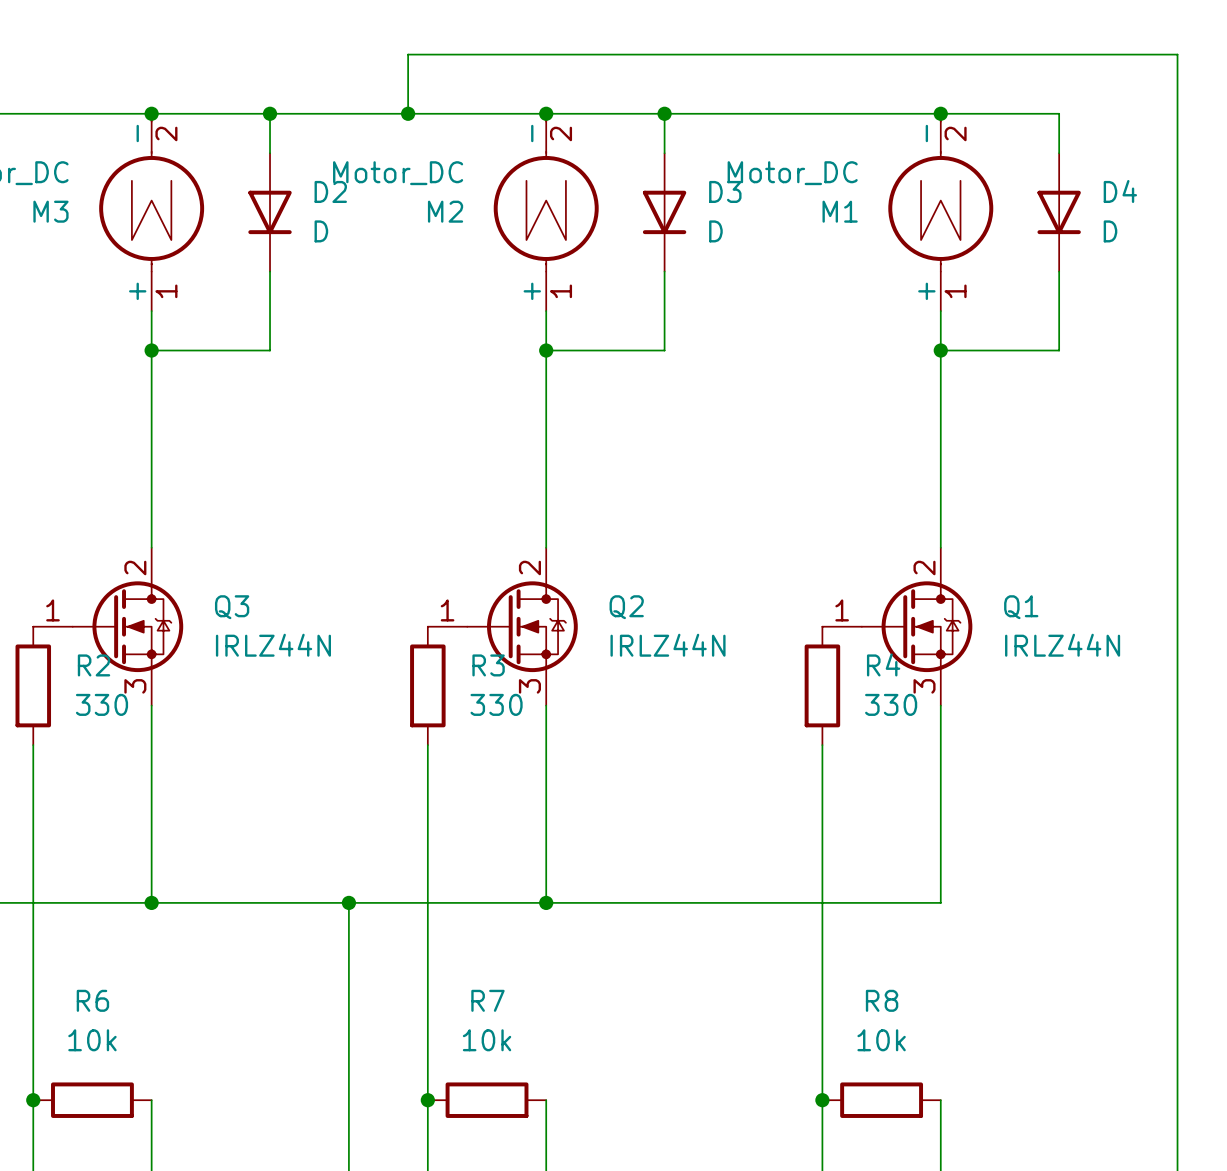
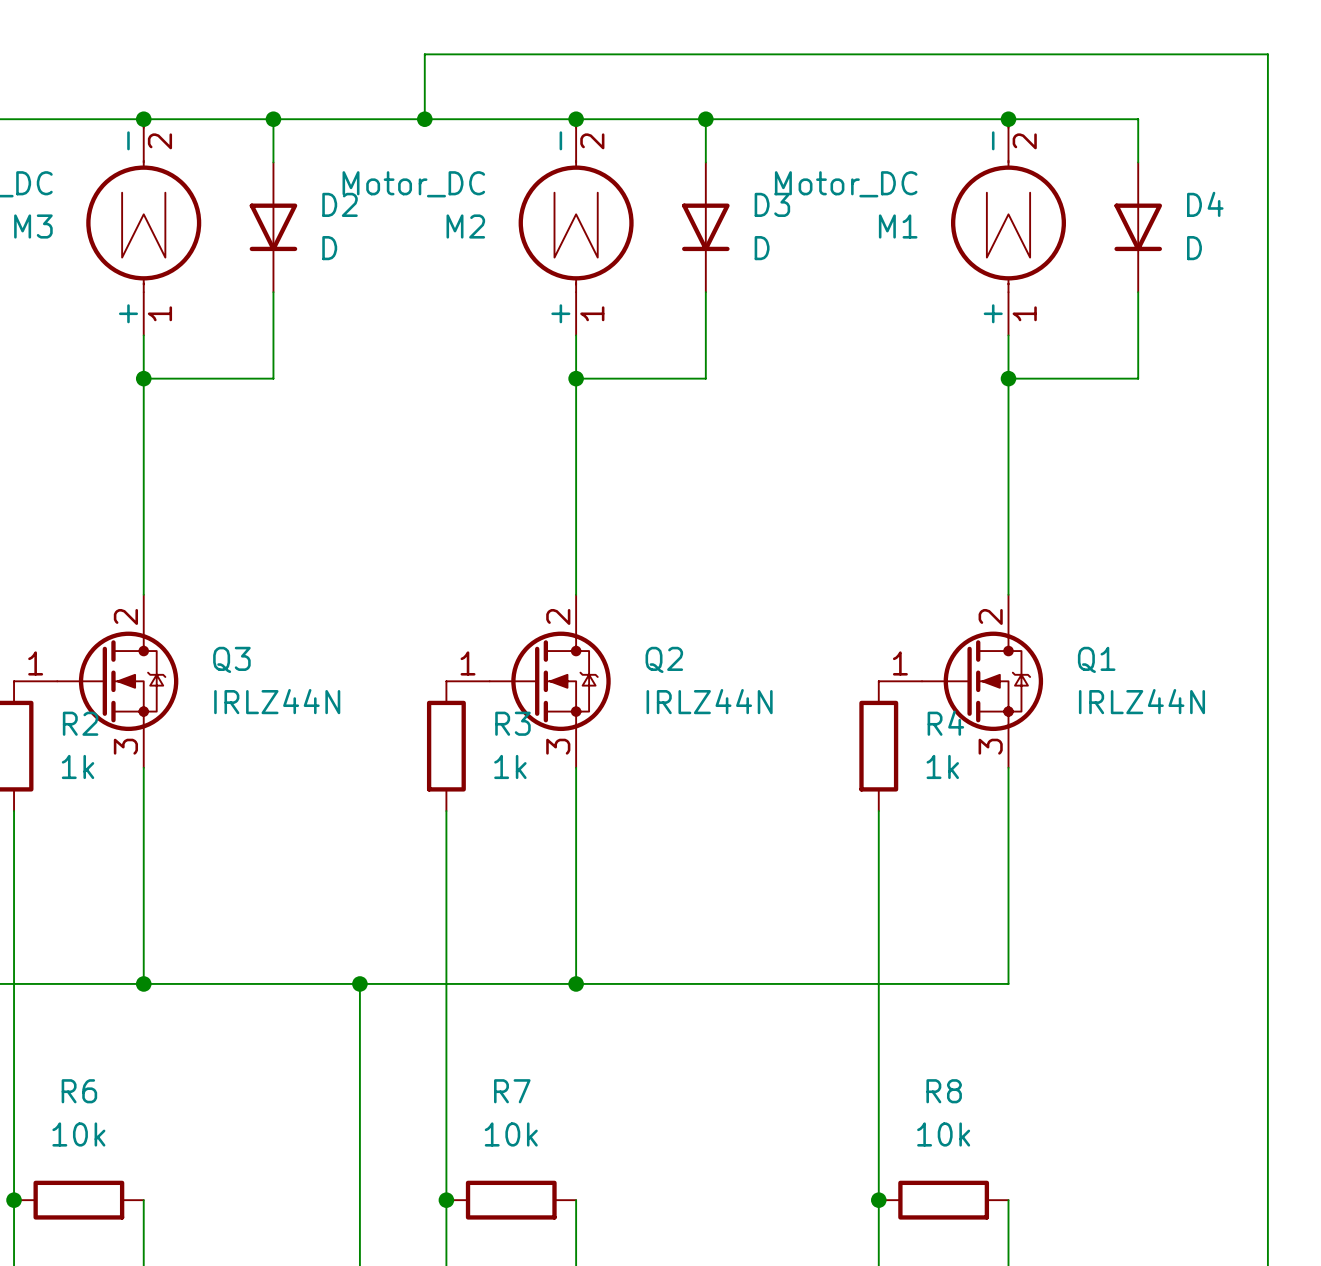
R2 value: 330 (102, 704) -> 1k (78, 766)
R3 value: 330 (496, 704) -> 1k (510, 766)
R4 value: 330 (891, 704) -> 1k (942, 766)

